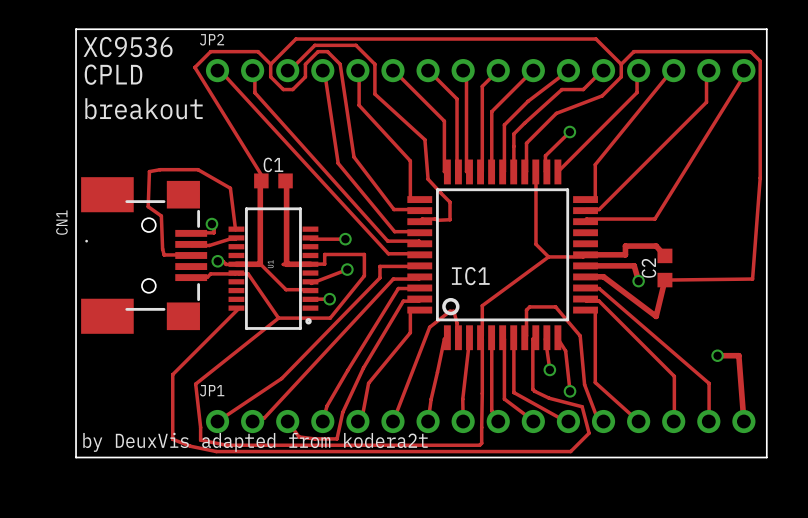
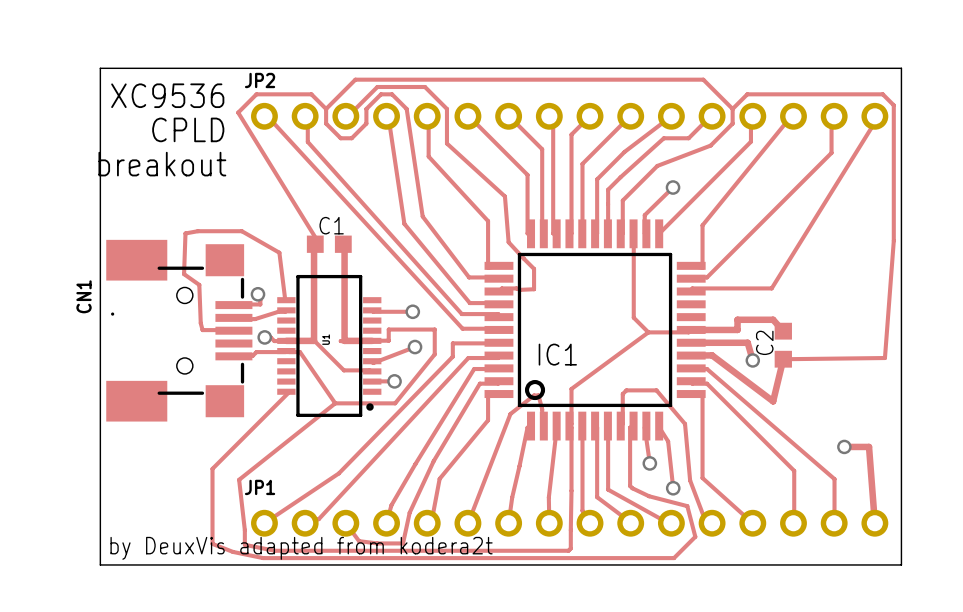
text position: XC9536 (128, 47) -> XC9536 (167, 95)
text position: CPLD (113, 74) -> CPLD (188, 129)
text position: breakout (144, 108) -> breakout (162, 164)

